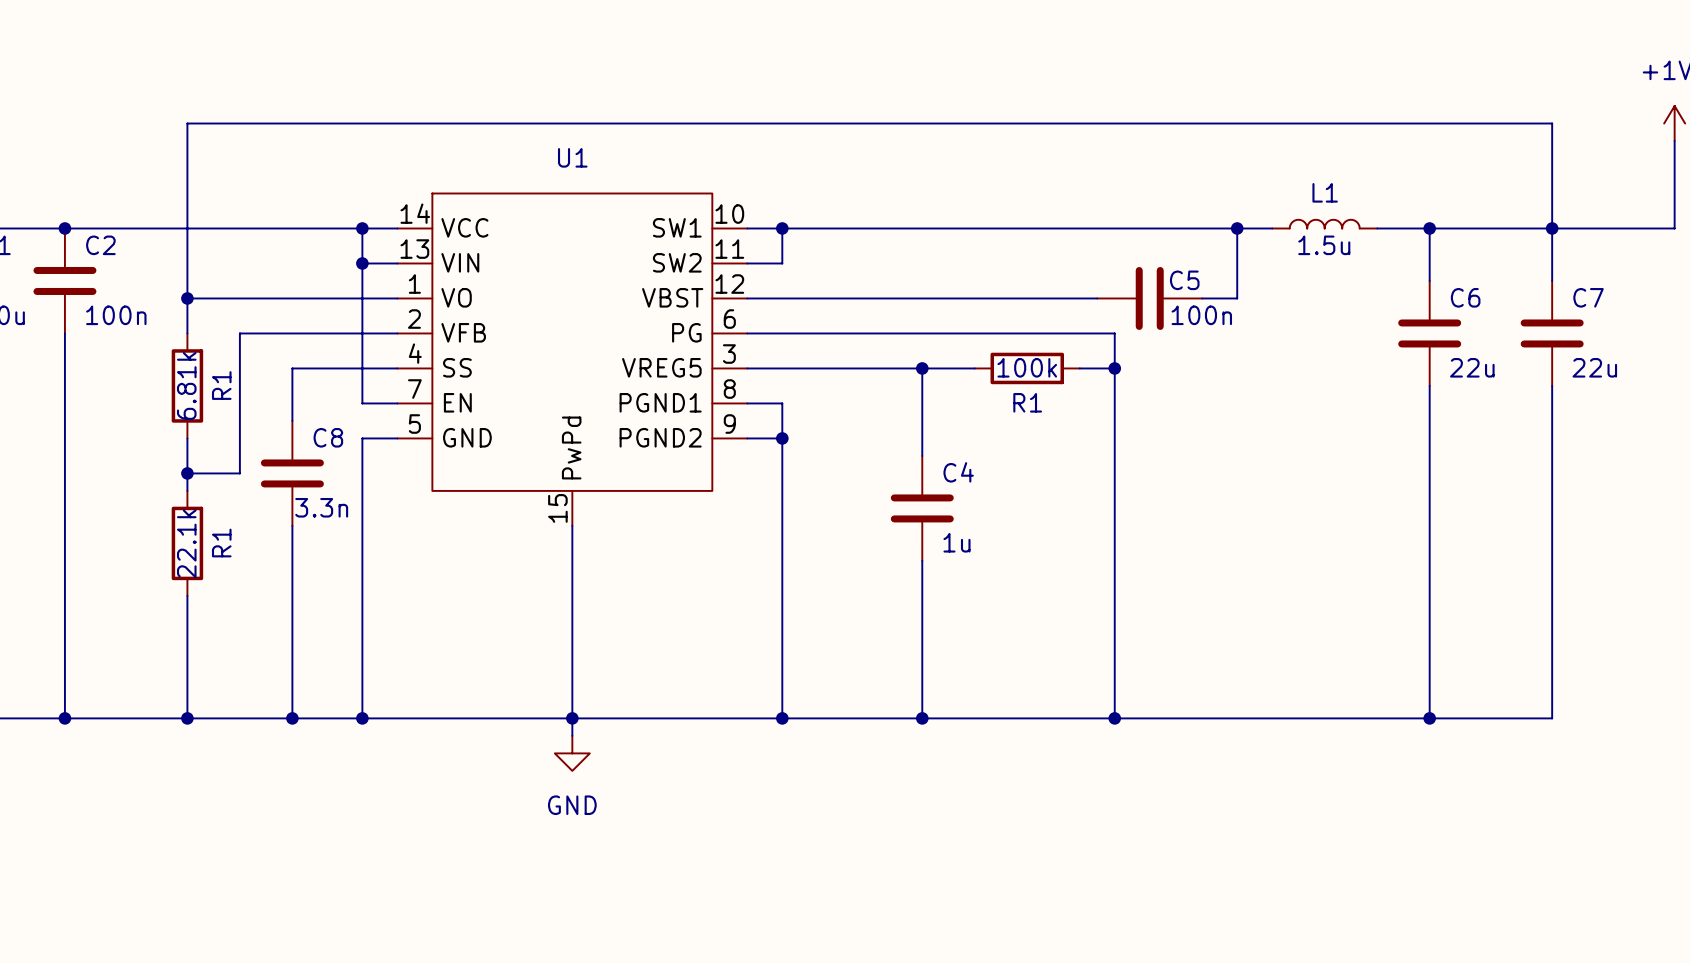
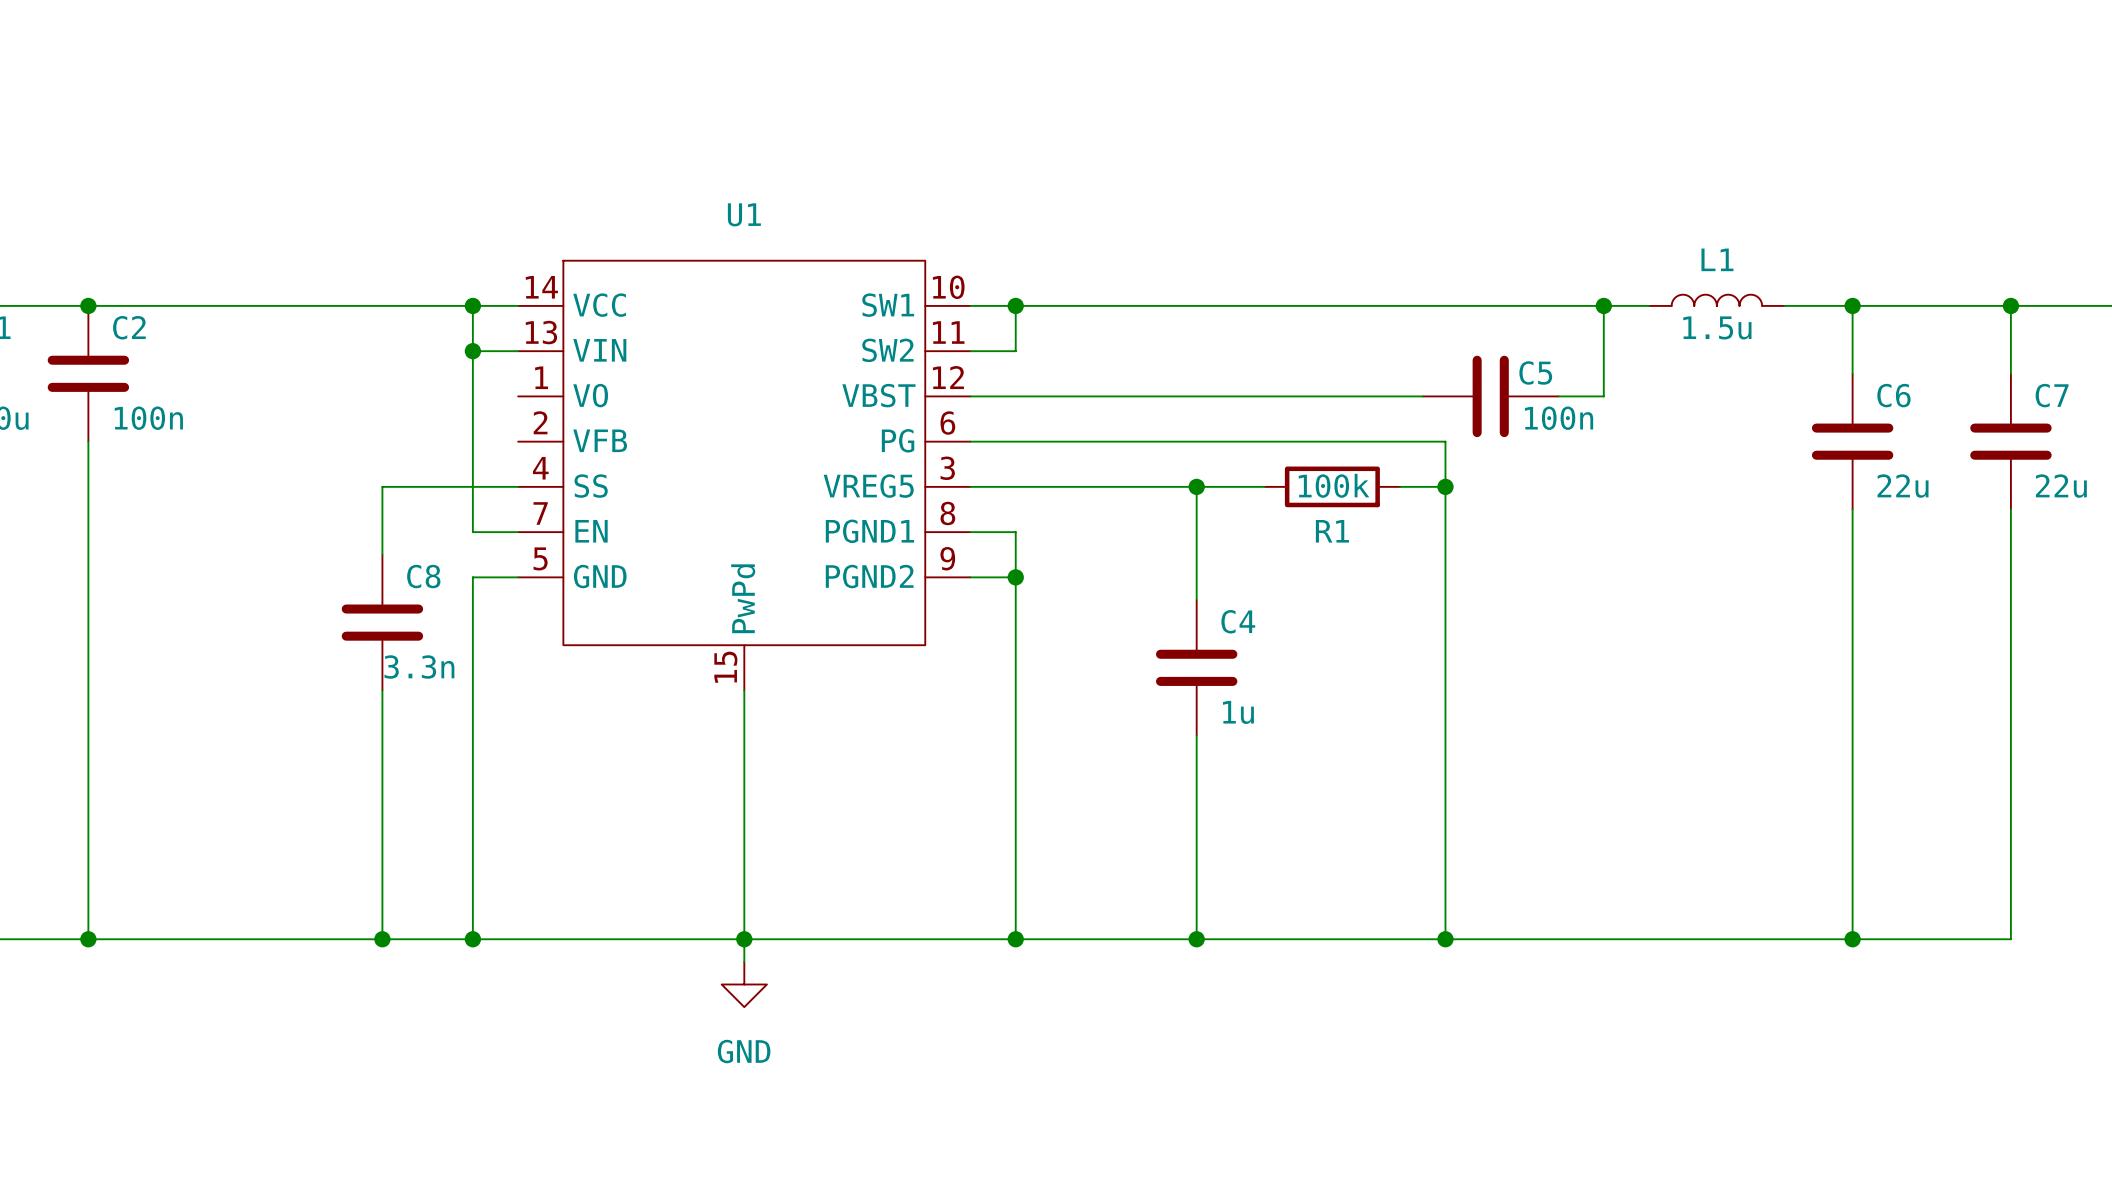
wire: (1552, 228) (1552, 123) (187, 123) (187, 333) -> none
wire: (187, 298) (397, 298) -> none
junction: (187, 298) -> none
wire: (397, 333) (239, 333) (239, 473) (187, 473) -> none
R1: 6.81k (187, 385) -> none
wire: (187, 438) (187, 490) -> none
junction: (187, 473) -> none
R1: 22.1k (187, 543) -> none
wire: (187, 595) (187, 718) -> none
junction: (187, 718) -> none

